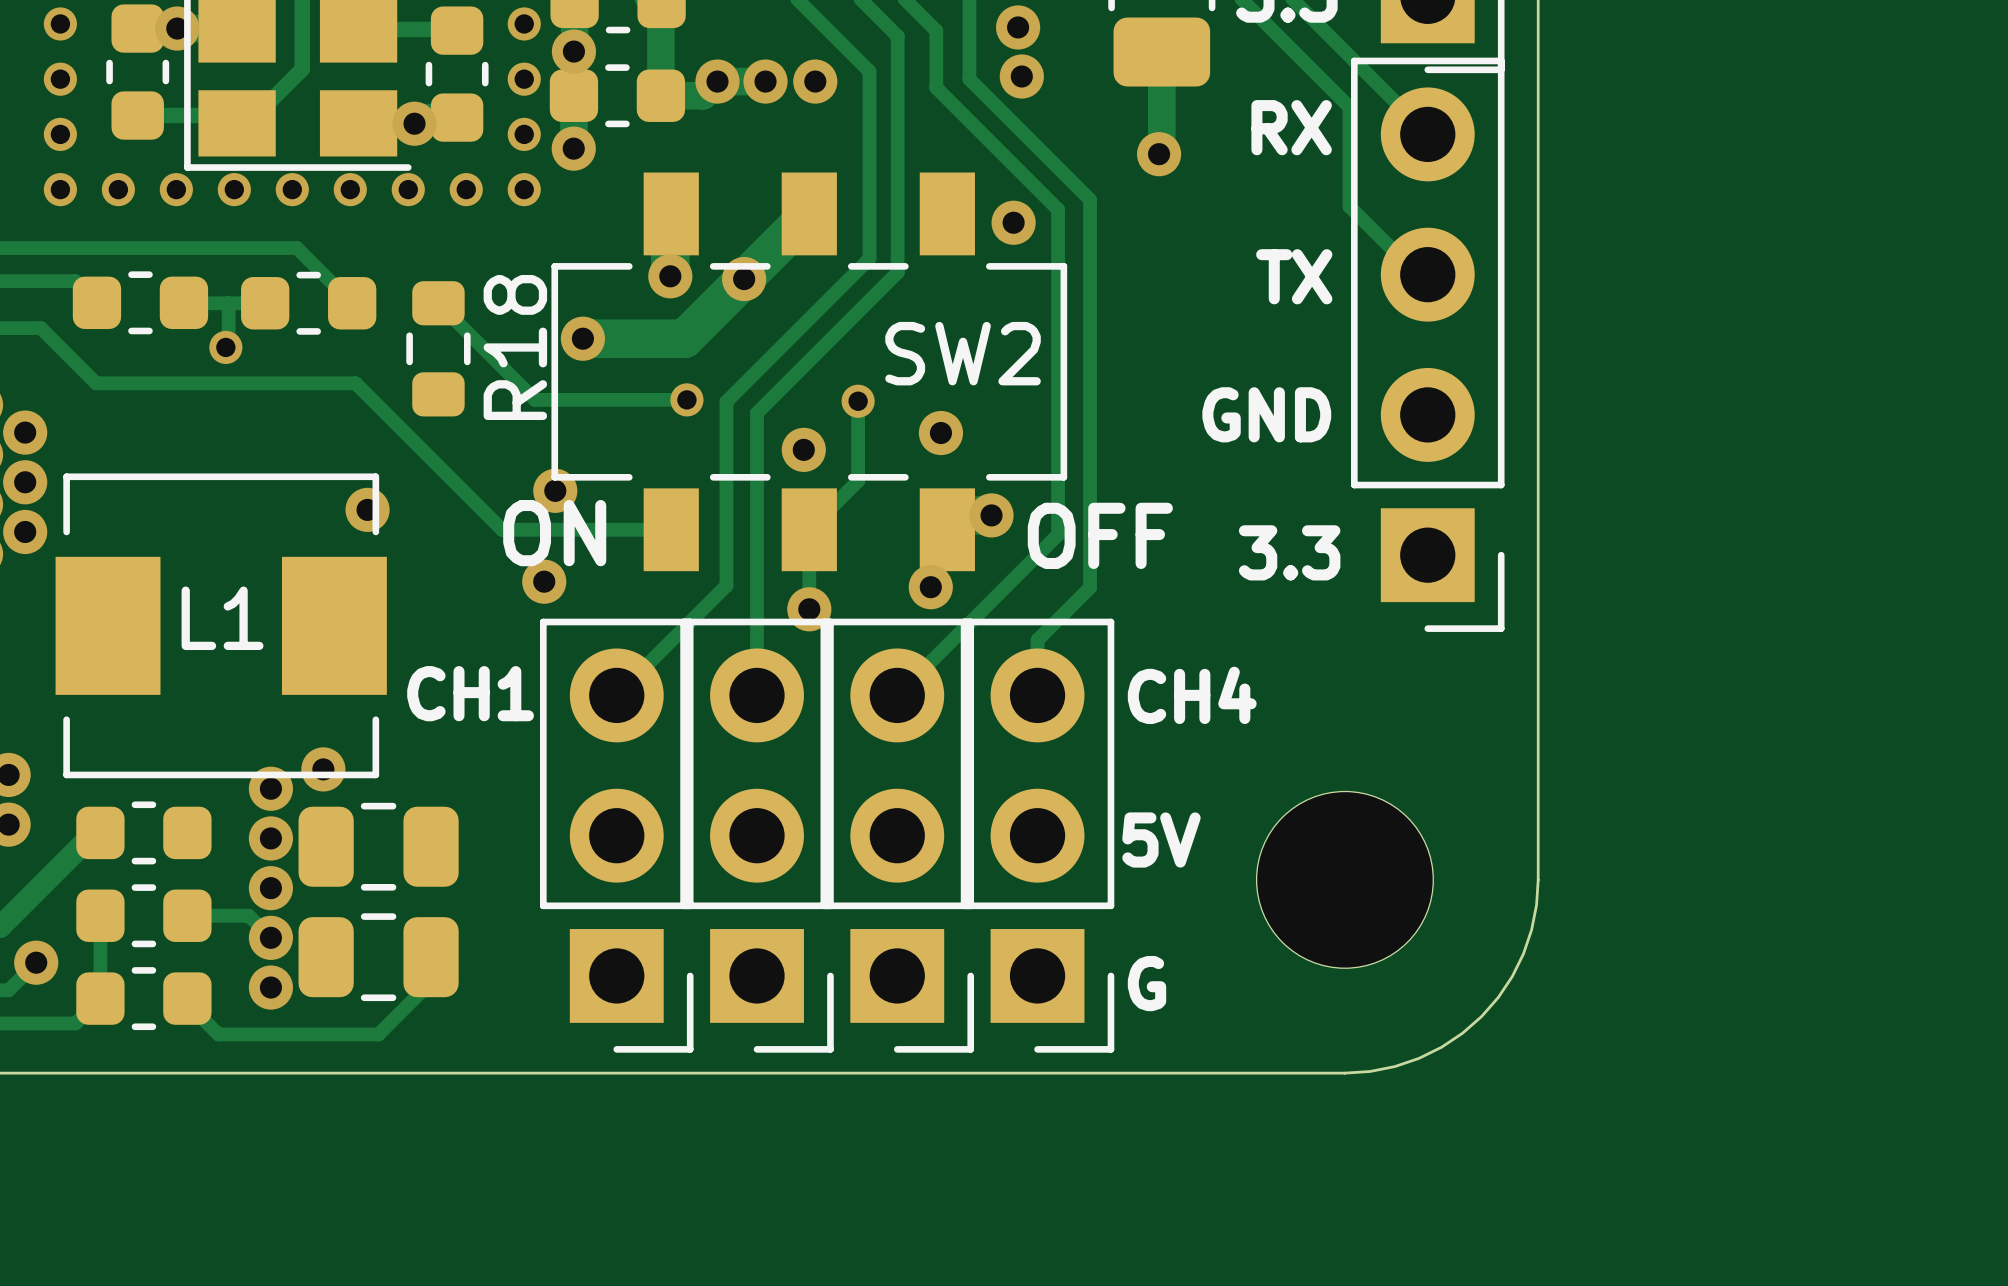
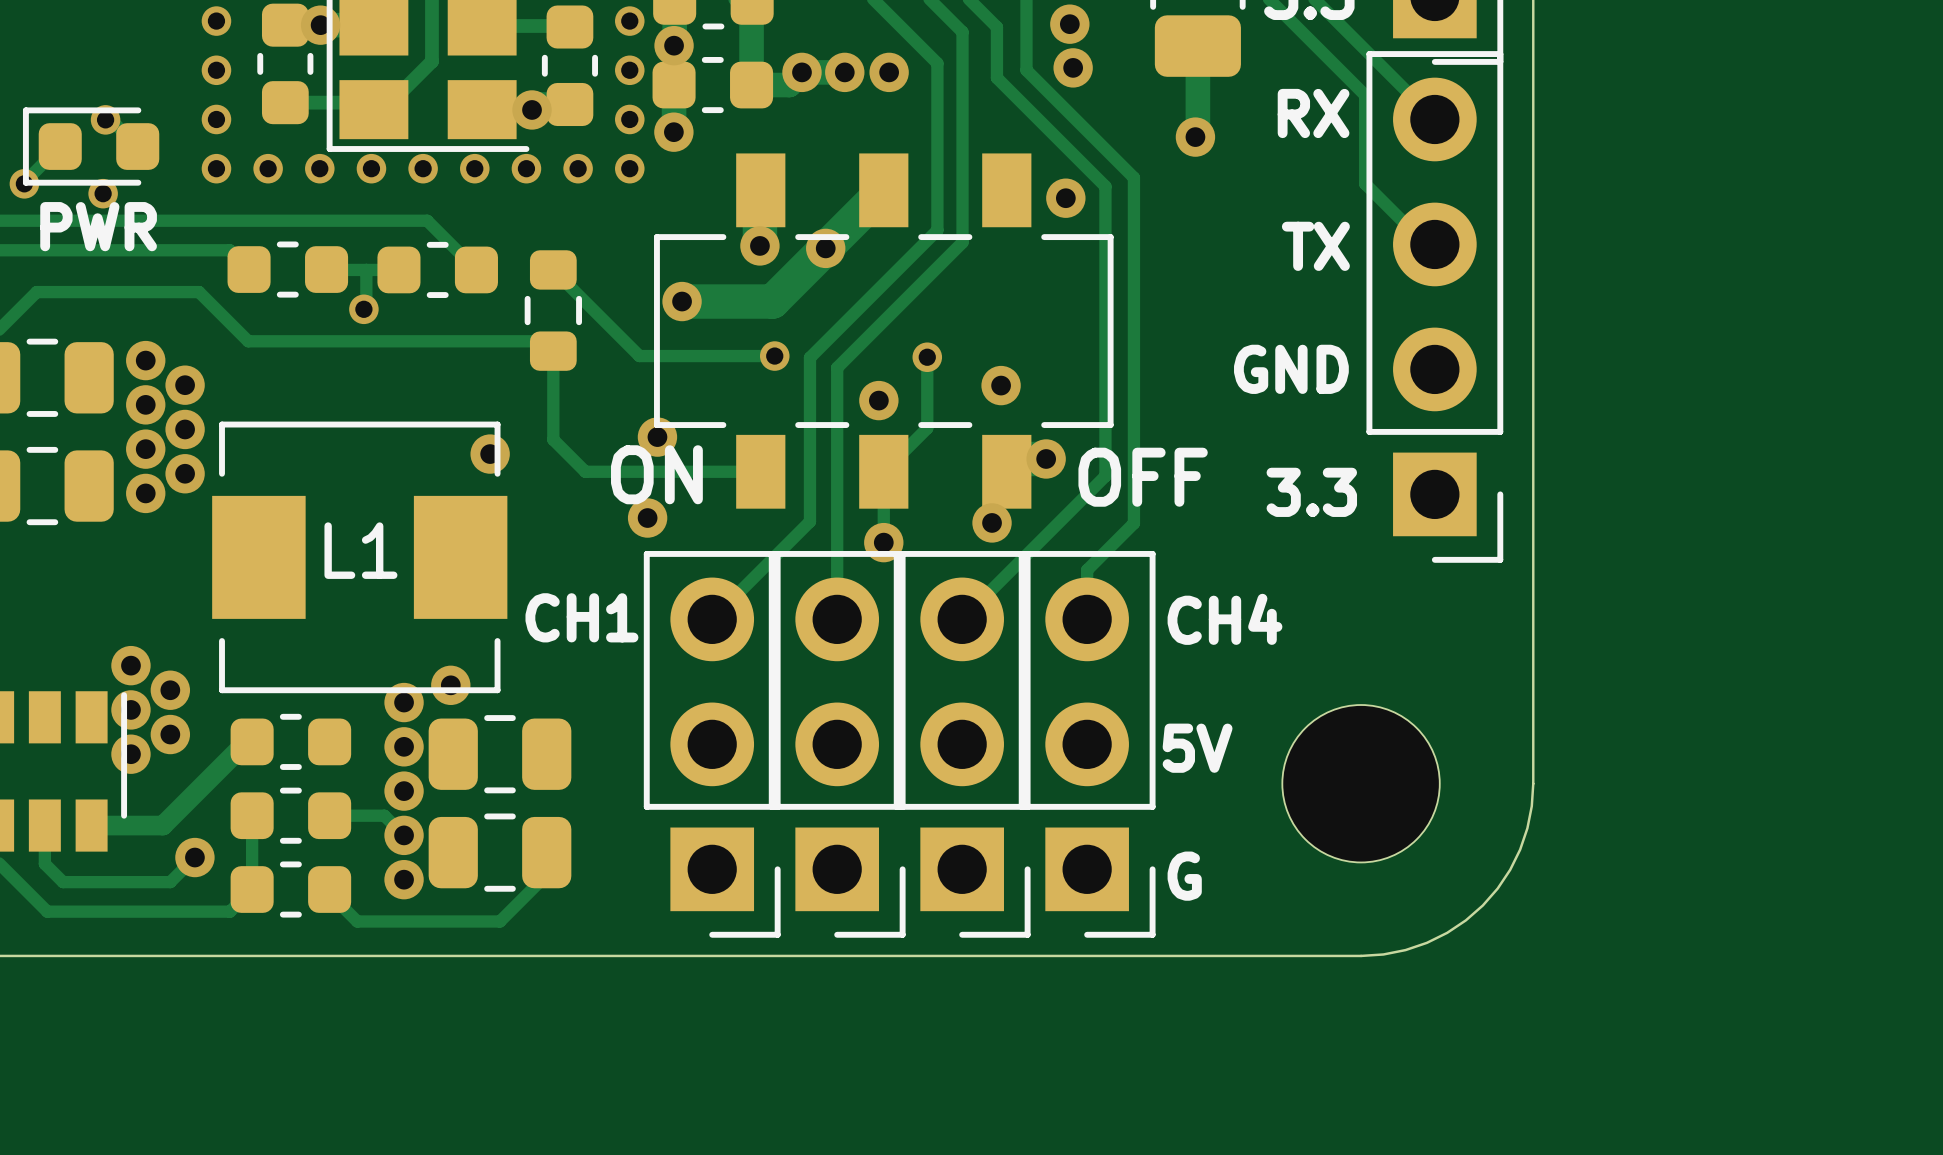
R18 name: R18 (515, 347) -> none
SW2 name: SW2 (963, 353) -> none
track: (355, 383) (502, 529) -> (479, 341) (543, 341) (553, 351) (553, 439) (585, 471) (610, 471)

